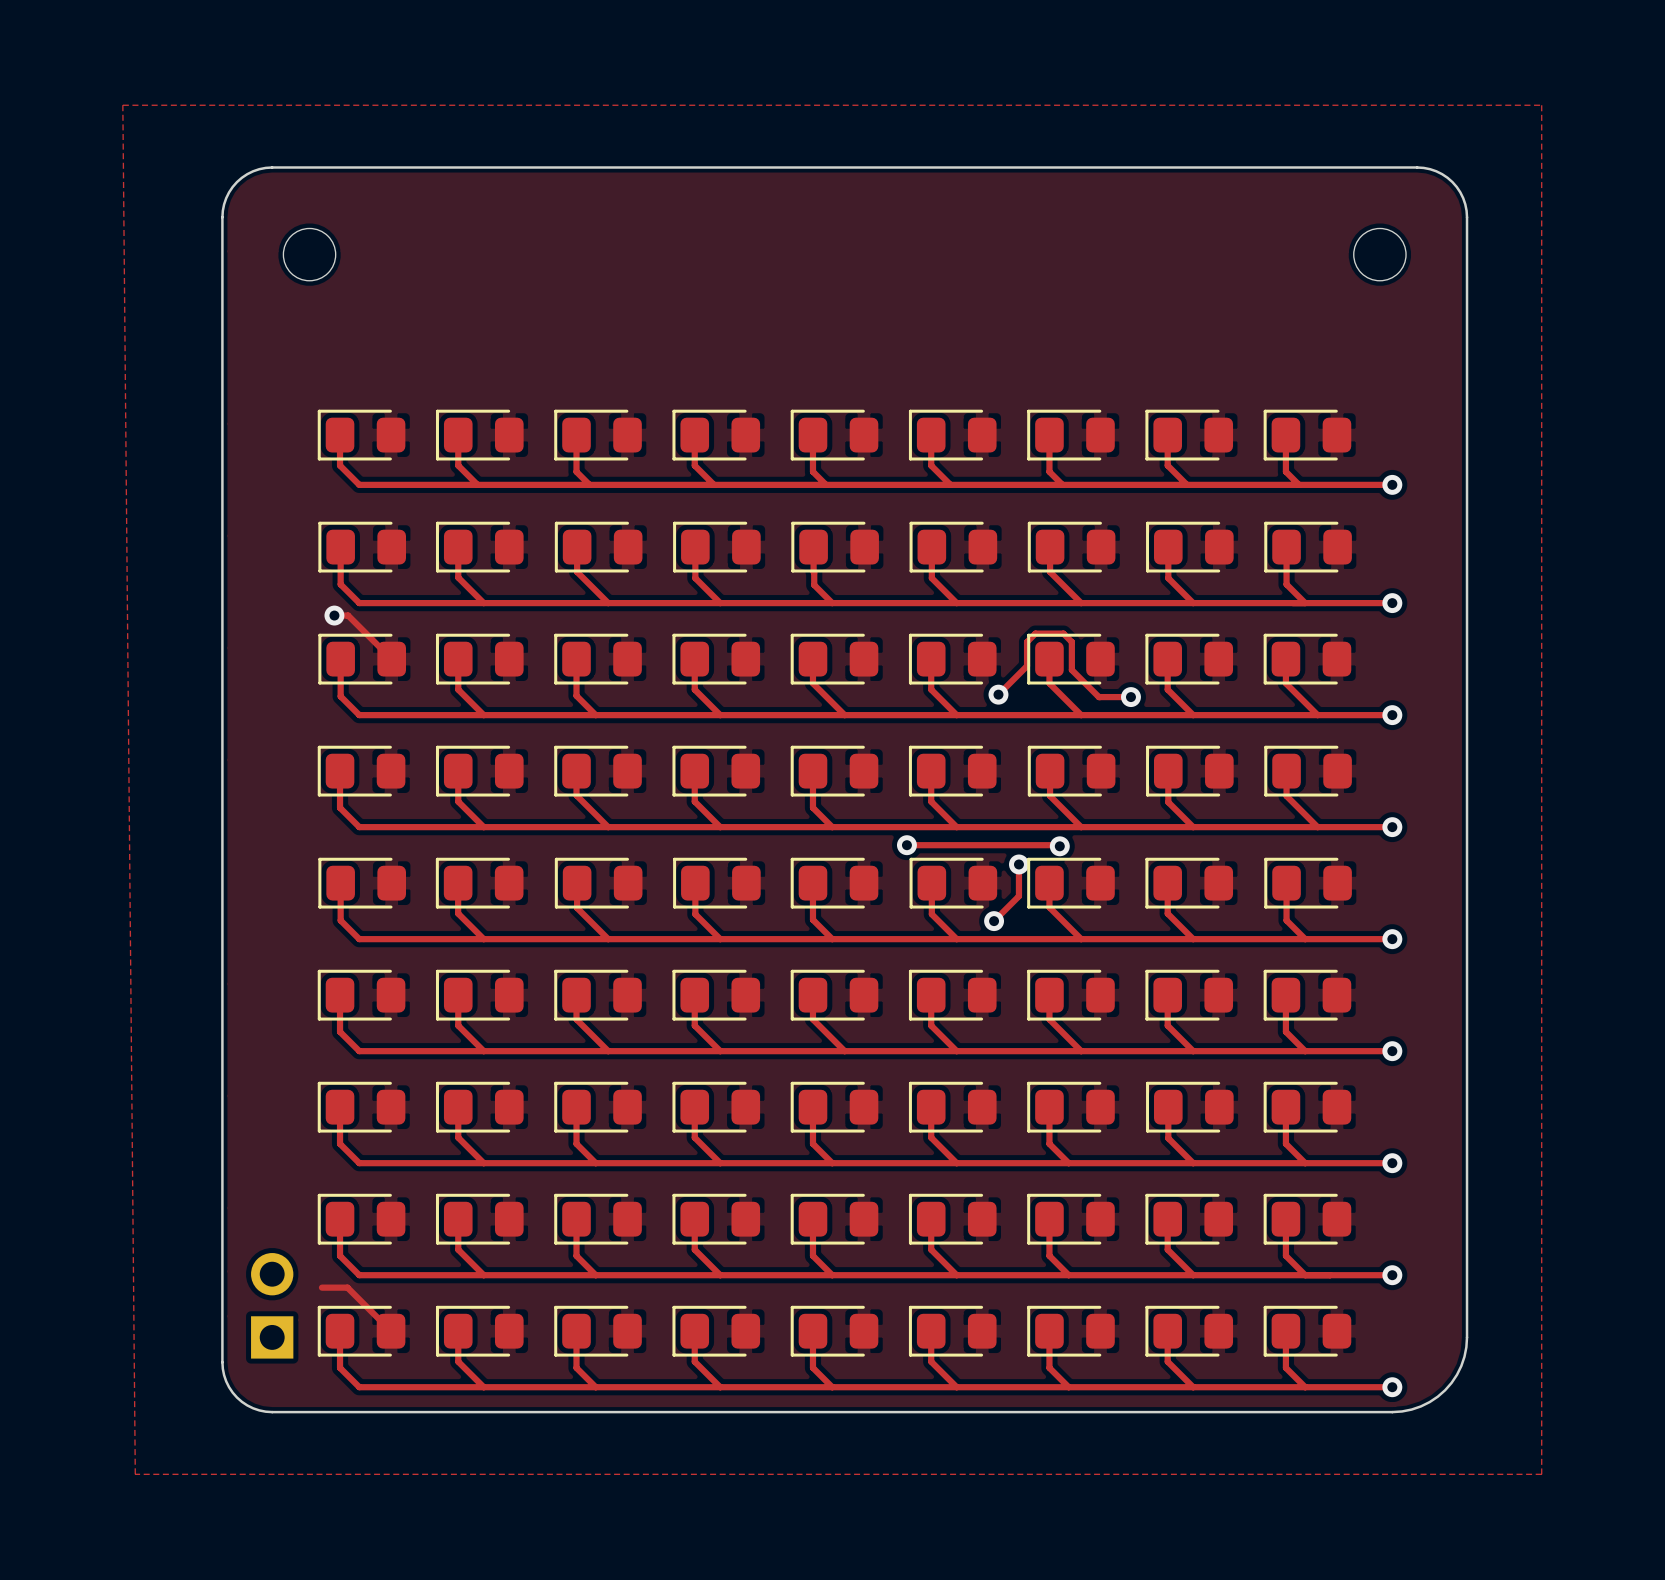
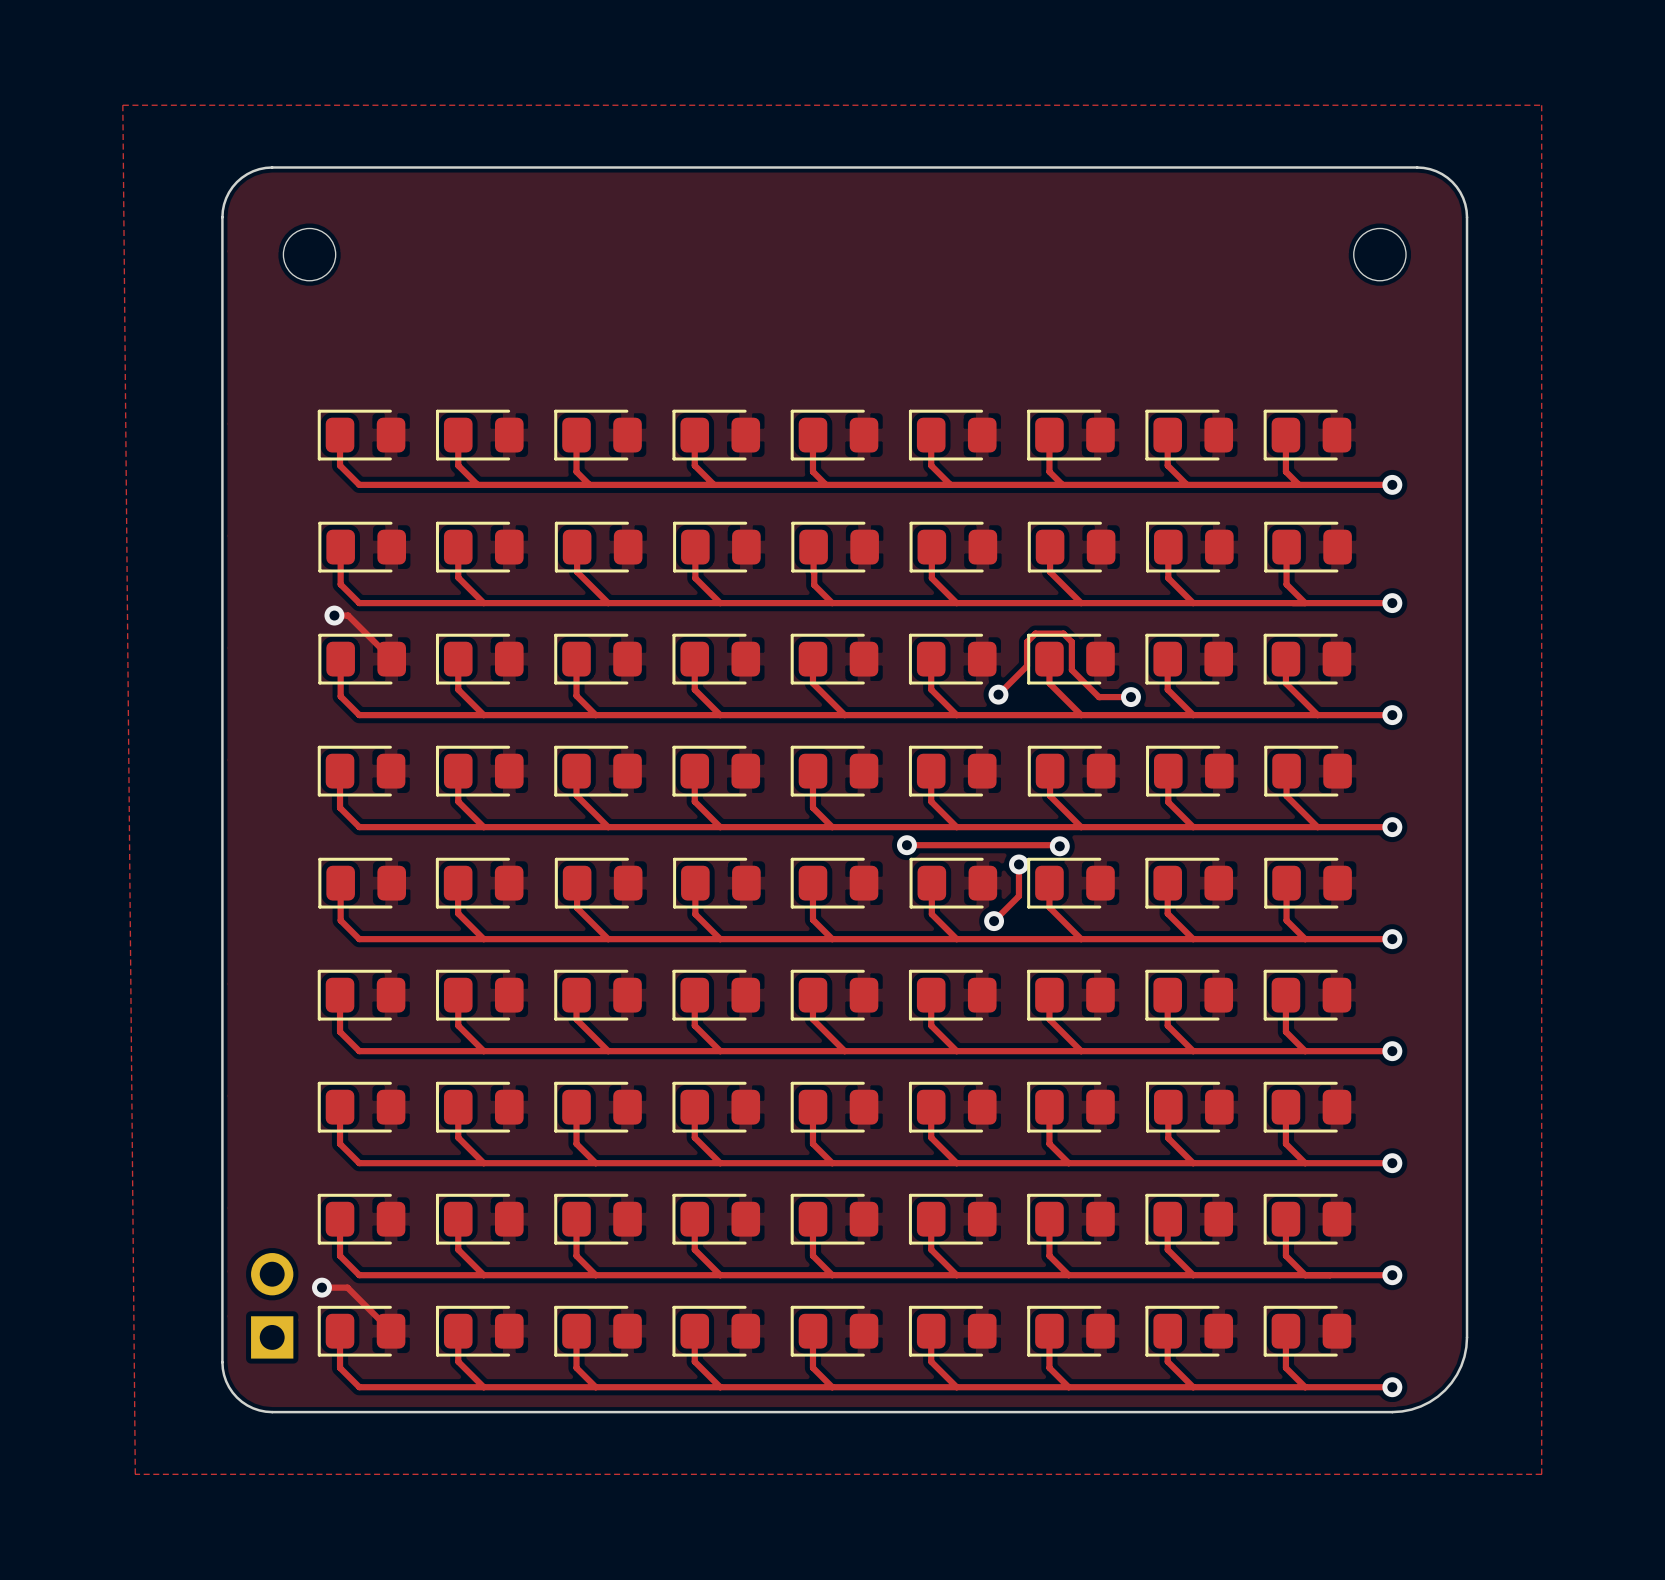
via: none -> (321, 1287)

